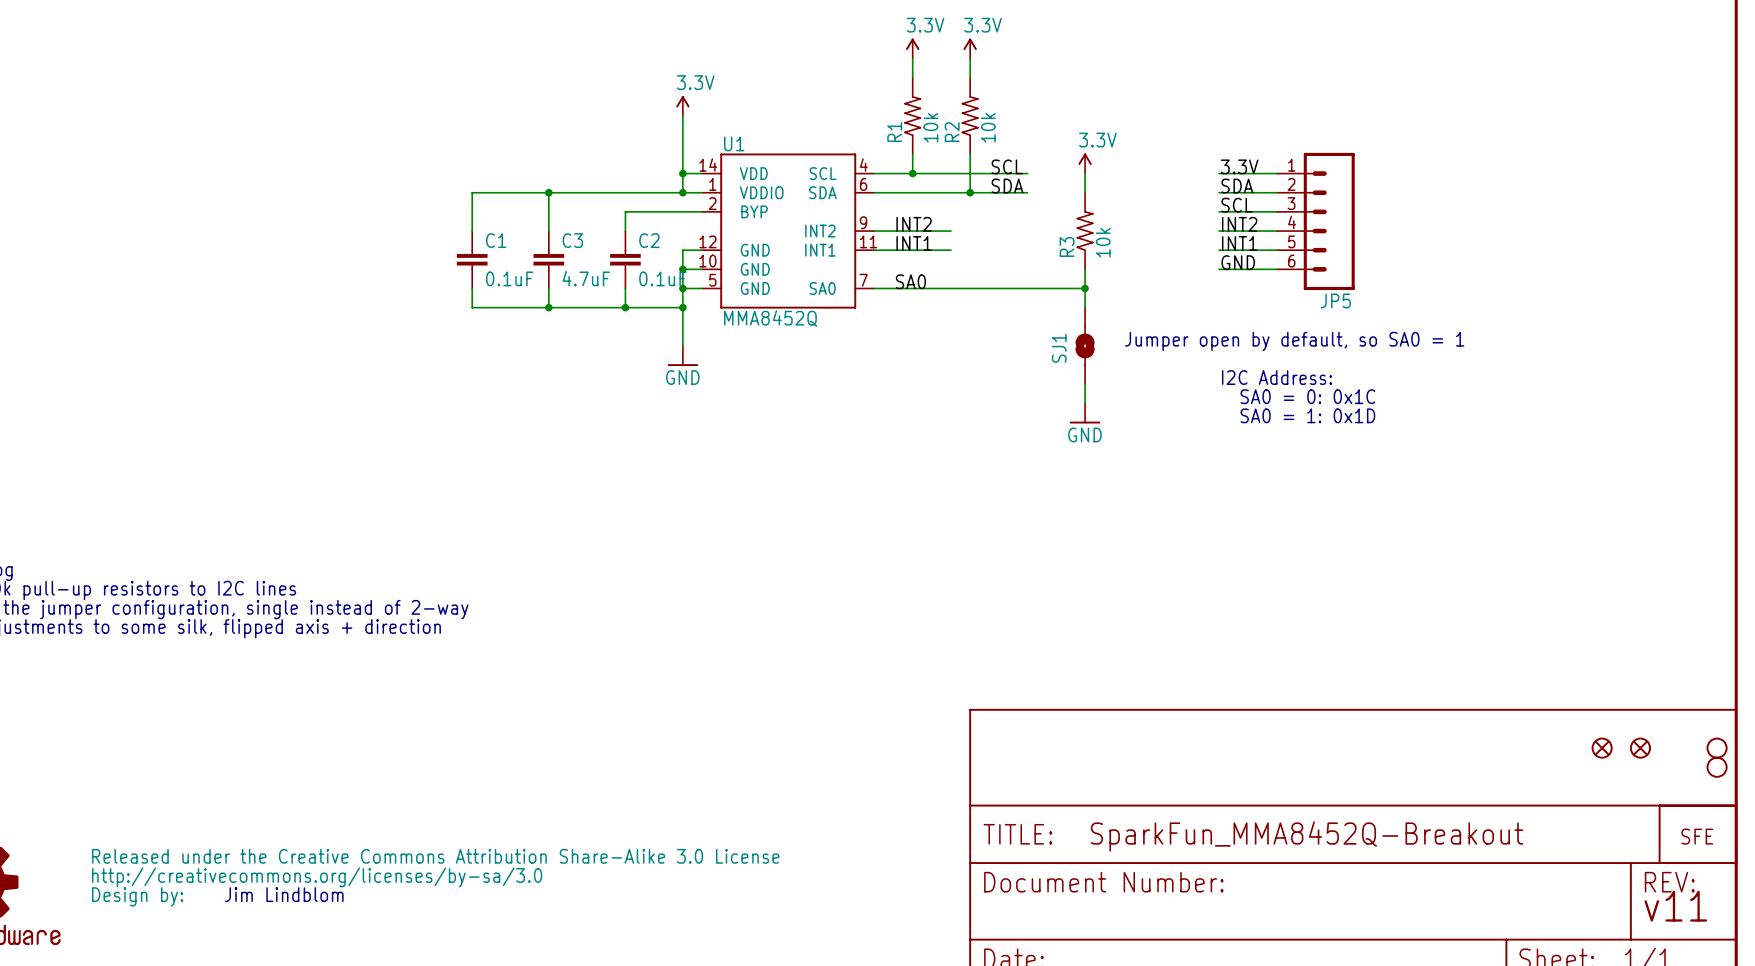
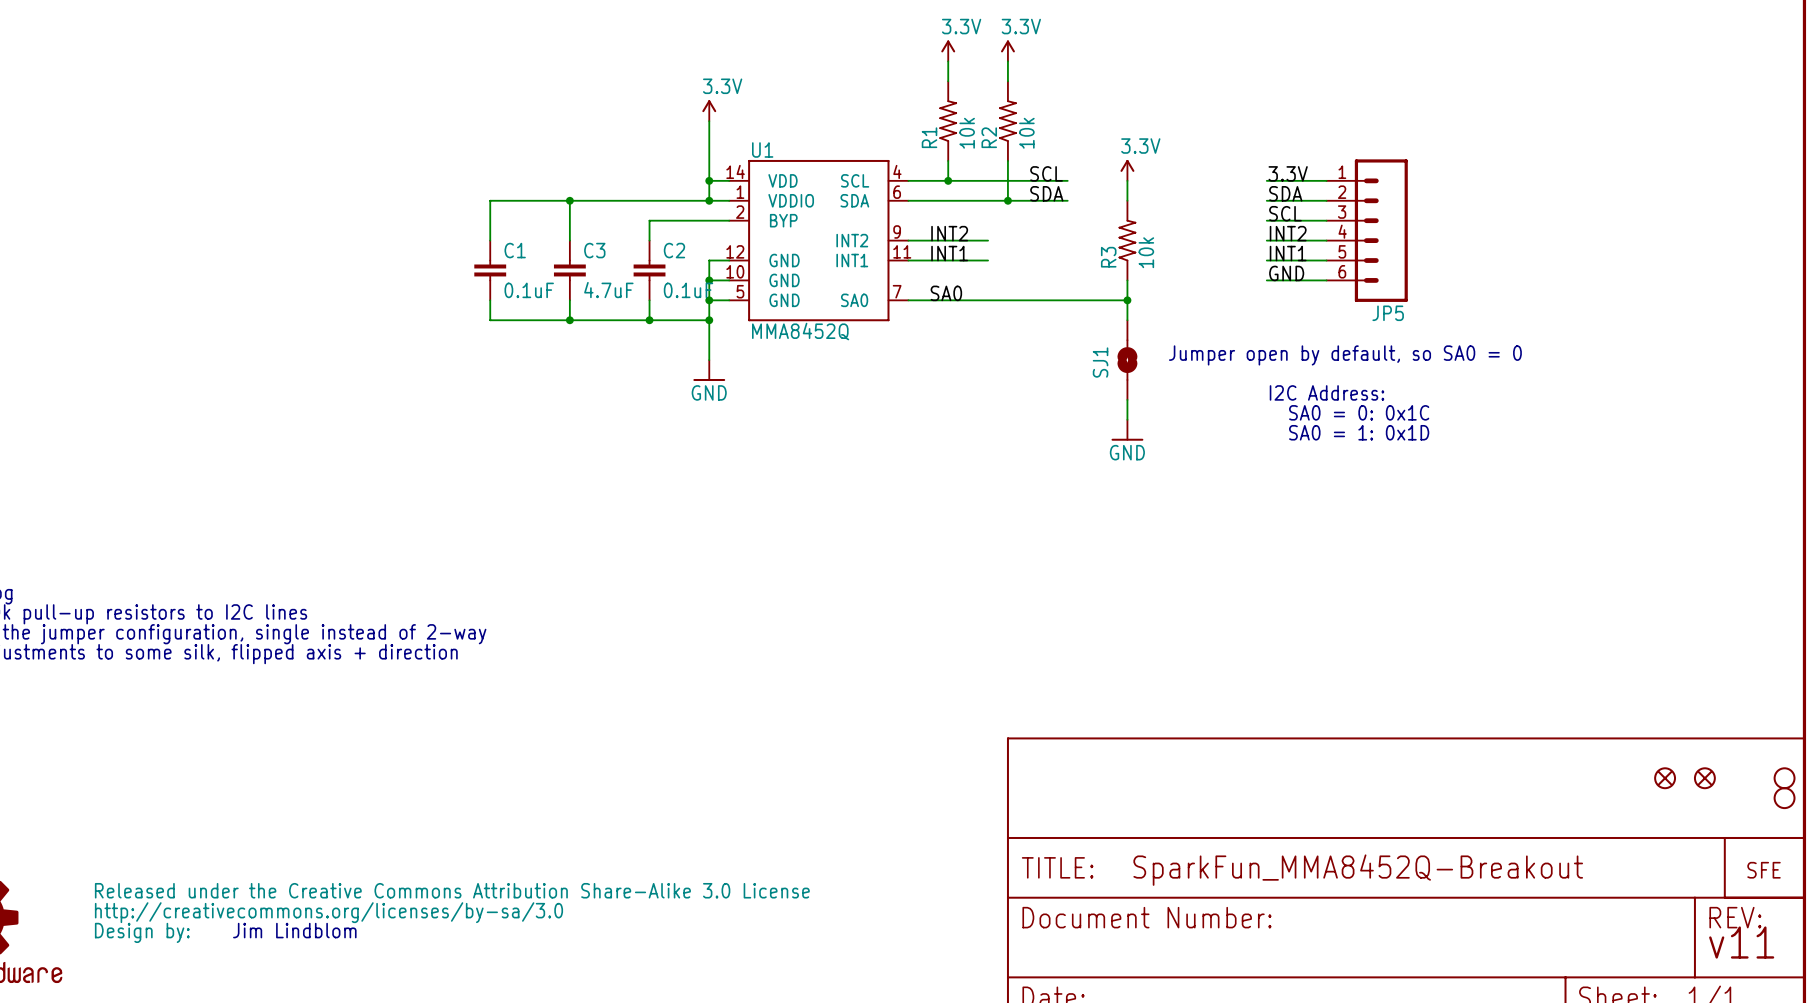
text: Jumper open by default, so SA0 = 1 (1294, 341) -> Jumper open by default, so SA0 = 0 (1345, 355)

